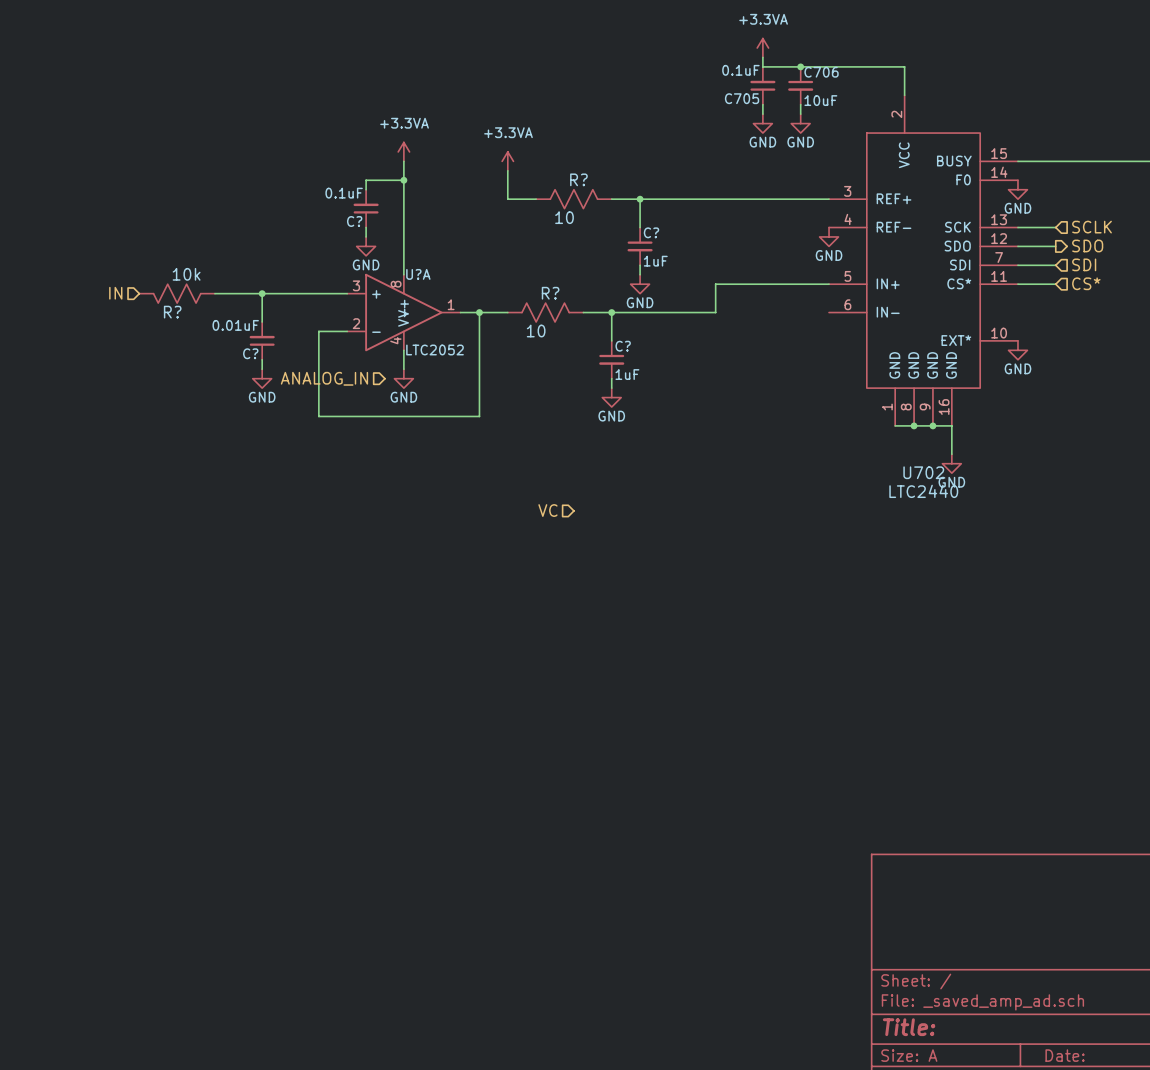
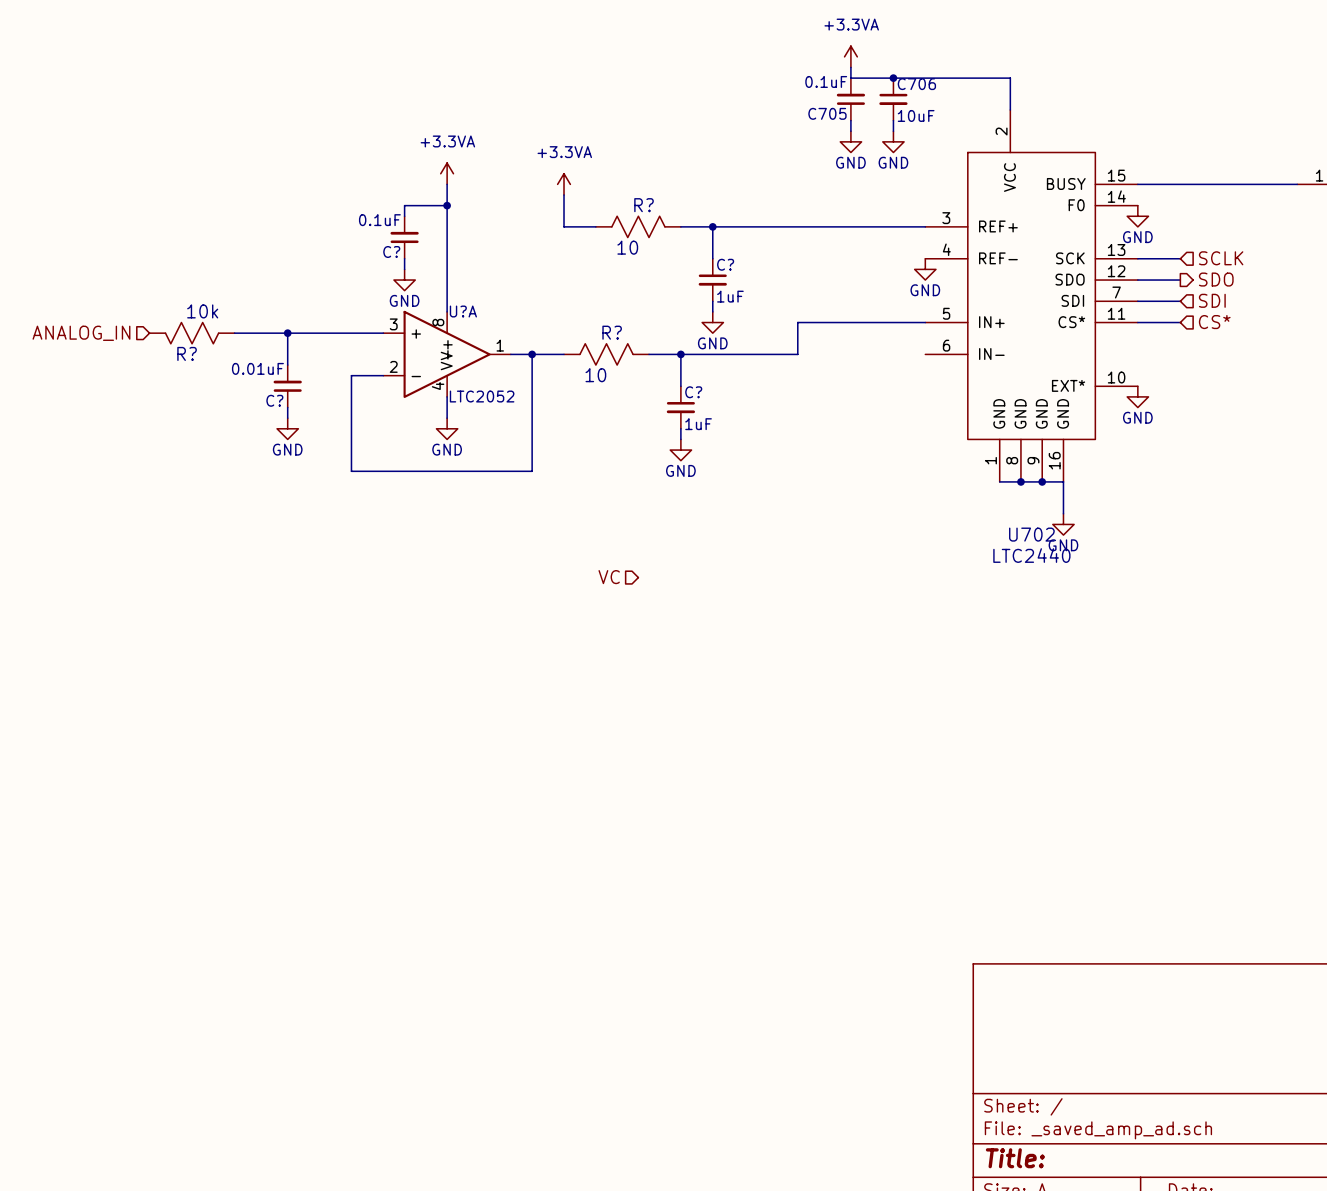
hierarchical label: IN (115, 293) -> ANALOG_IN (81, 333)
hierarchical label: ANALOG_IN (324, 378) -> none

